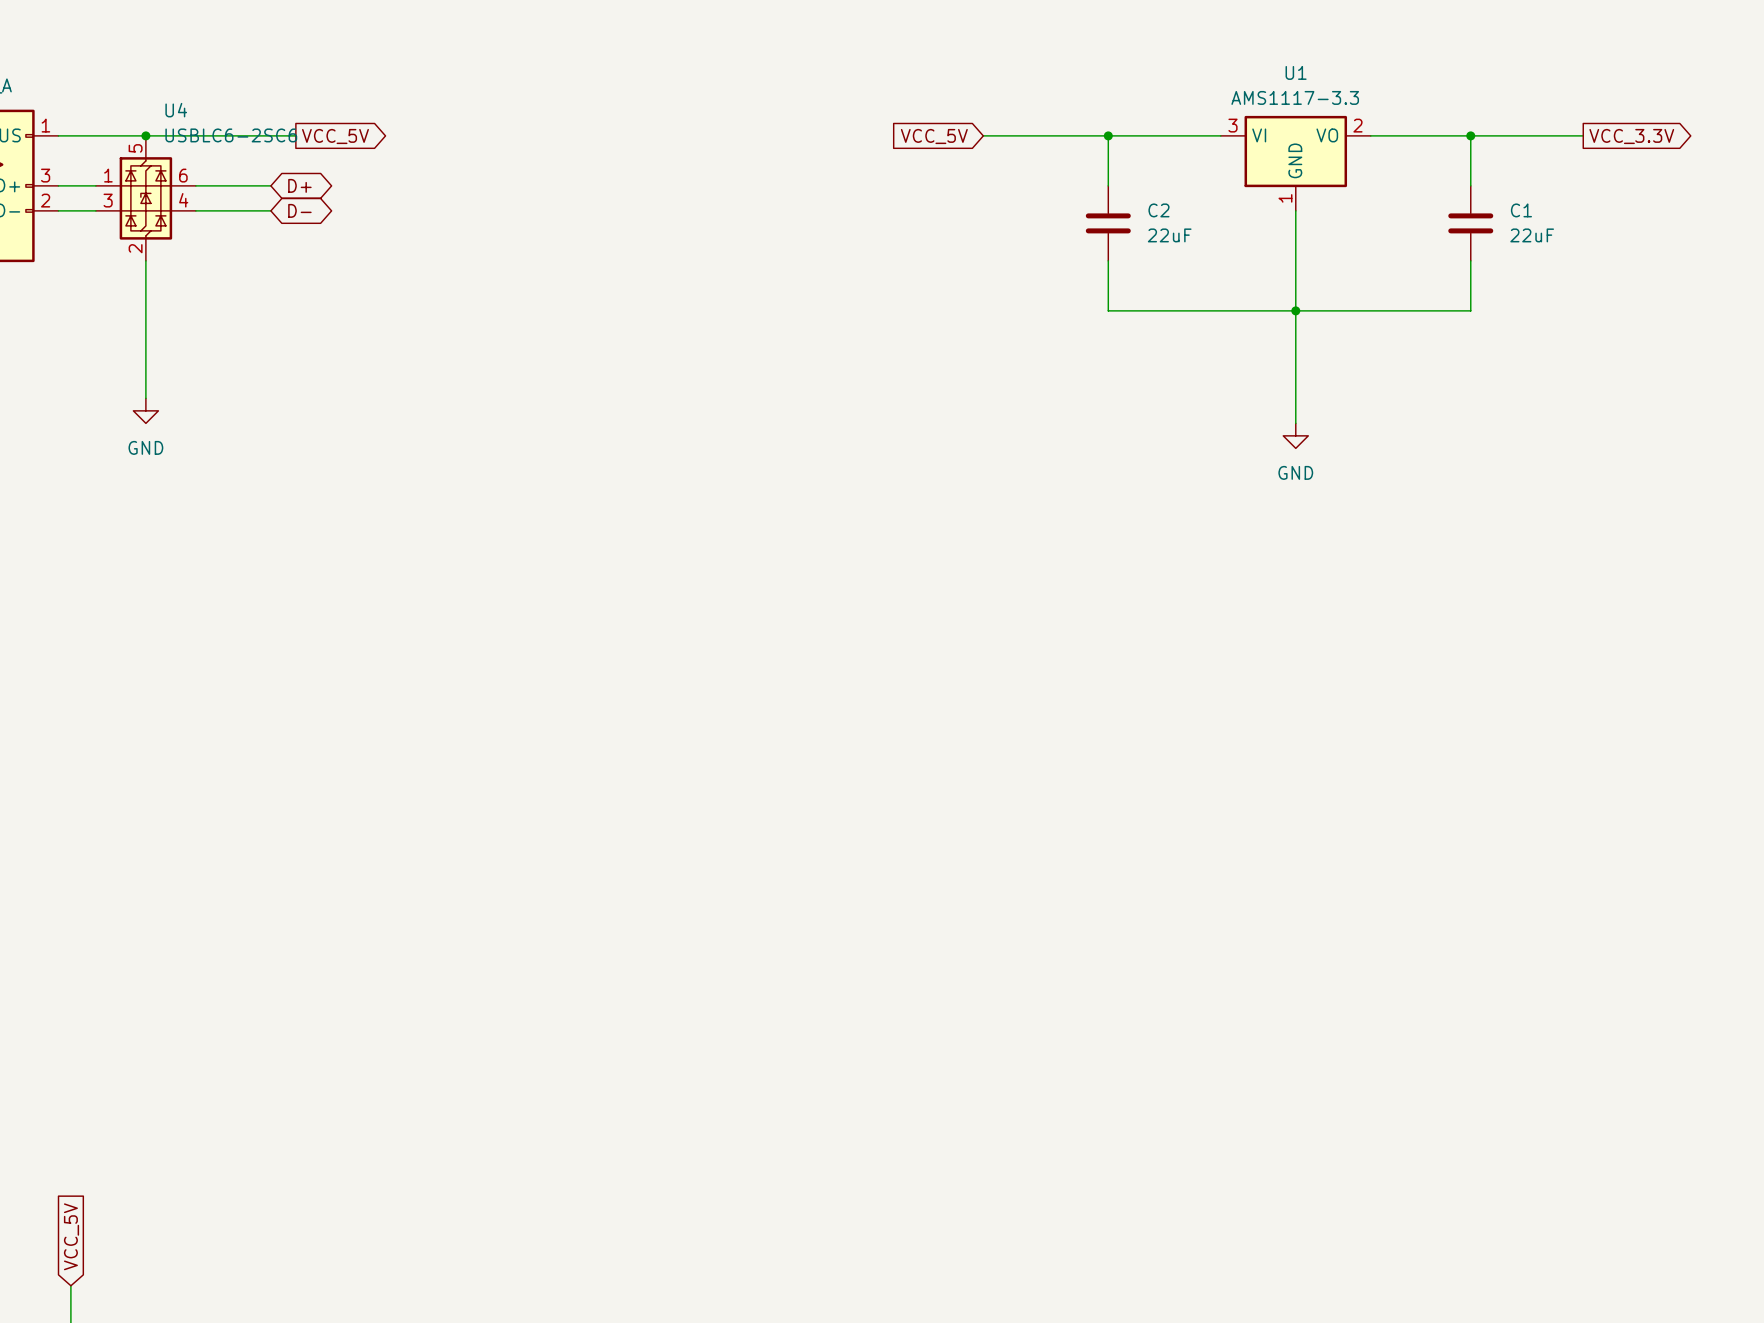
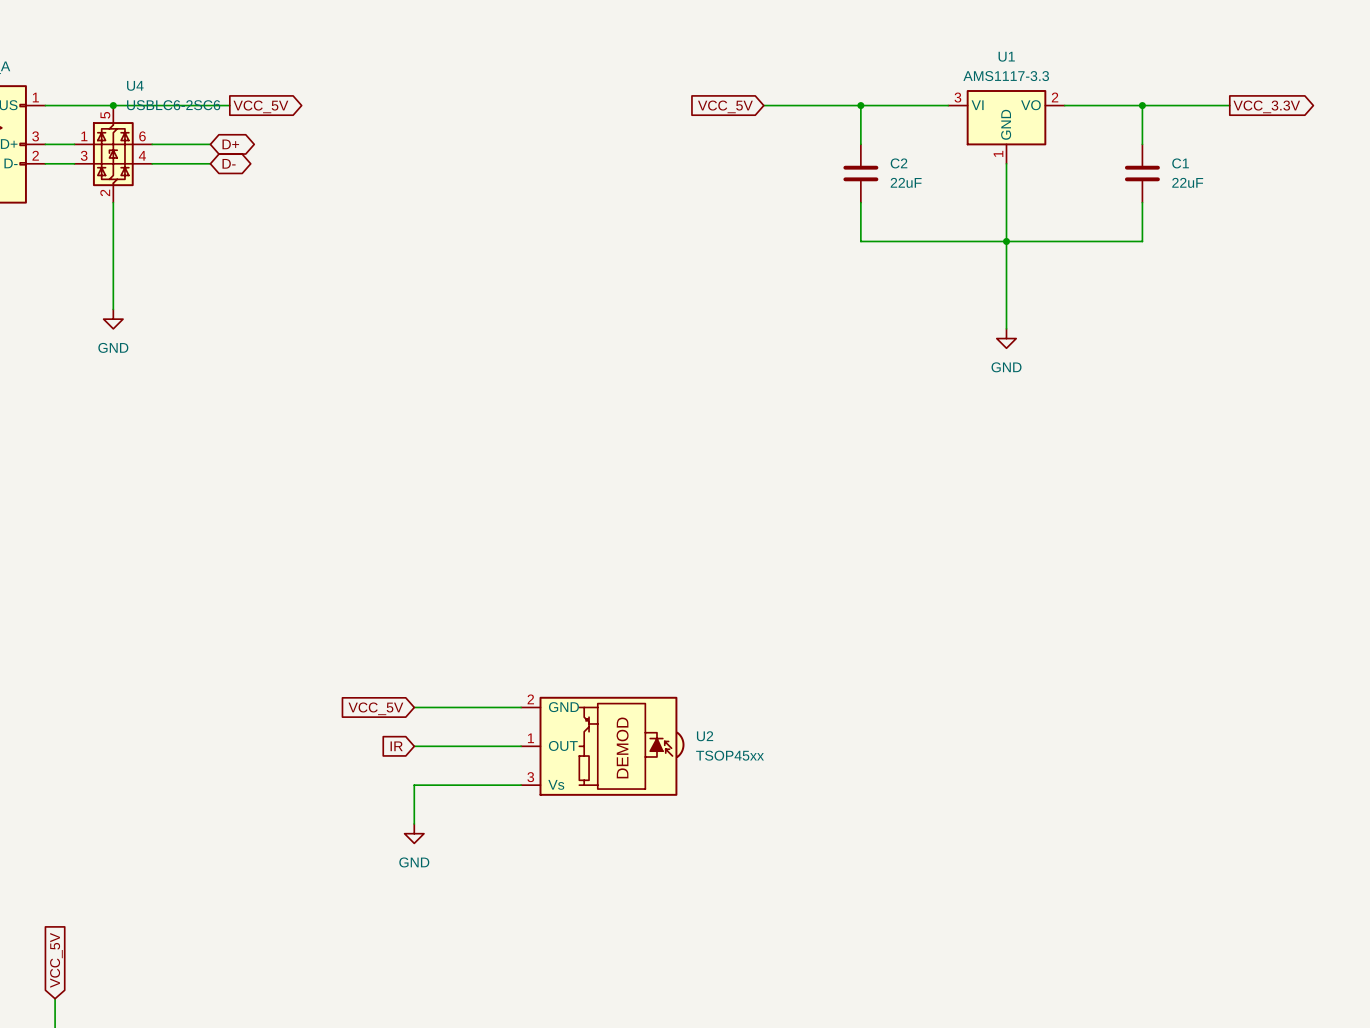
wire: none -> (414, 707) (521, 707)
global label: none -> VCC_5V (375, 708)
global label: none -> IR (396, 746)
wire: none -> (414, 746) (521, 746)
U2: none -> TSOP45xx (602, 746)
wire: none -> (521, 785) (414, 785) (414, 823)
power symbol: none -> GND (414, 833)

